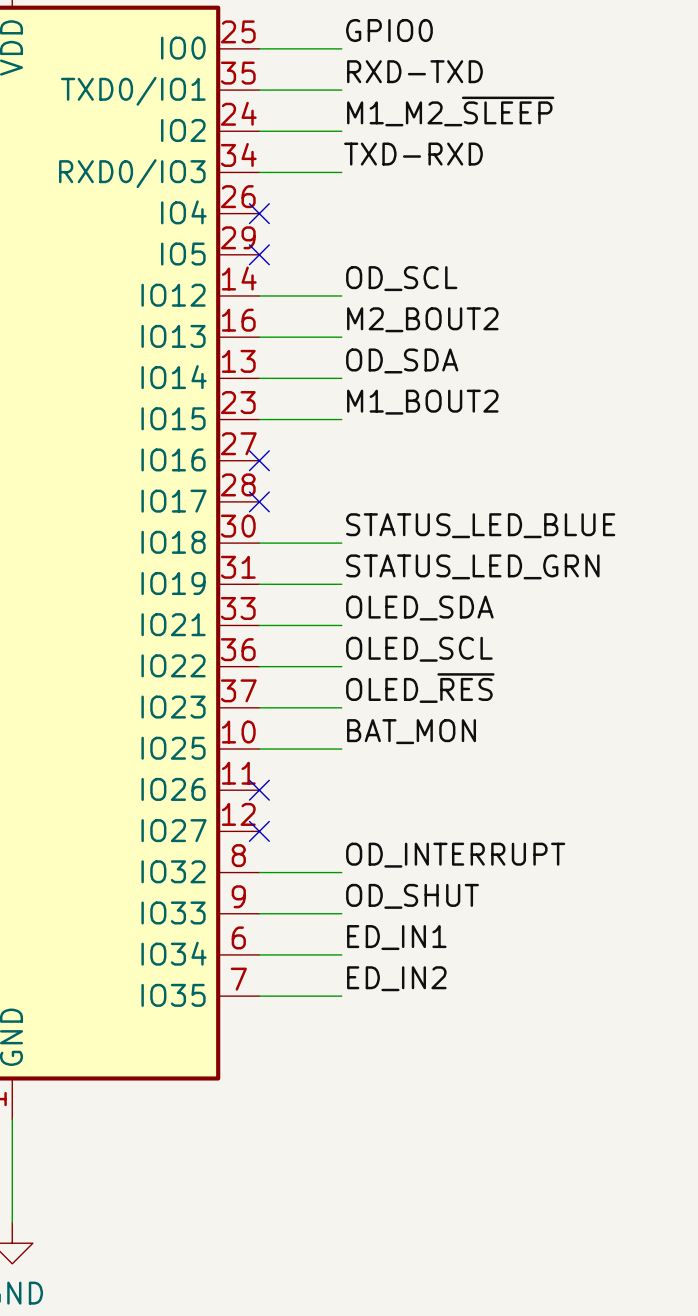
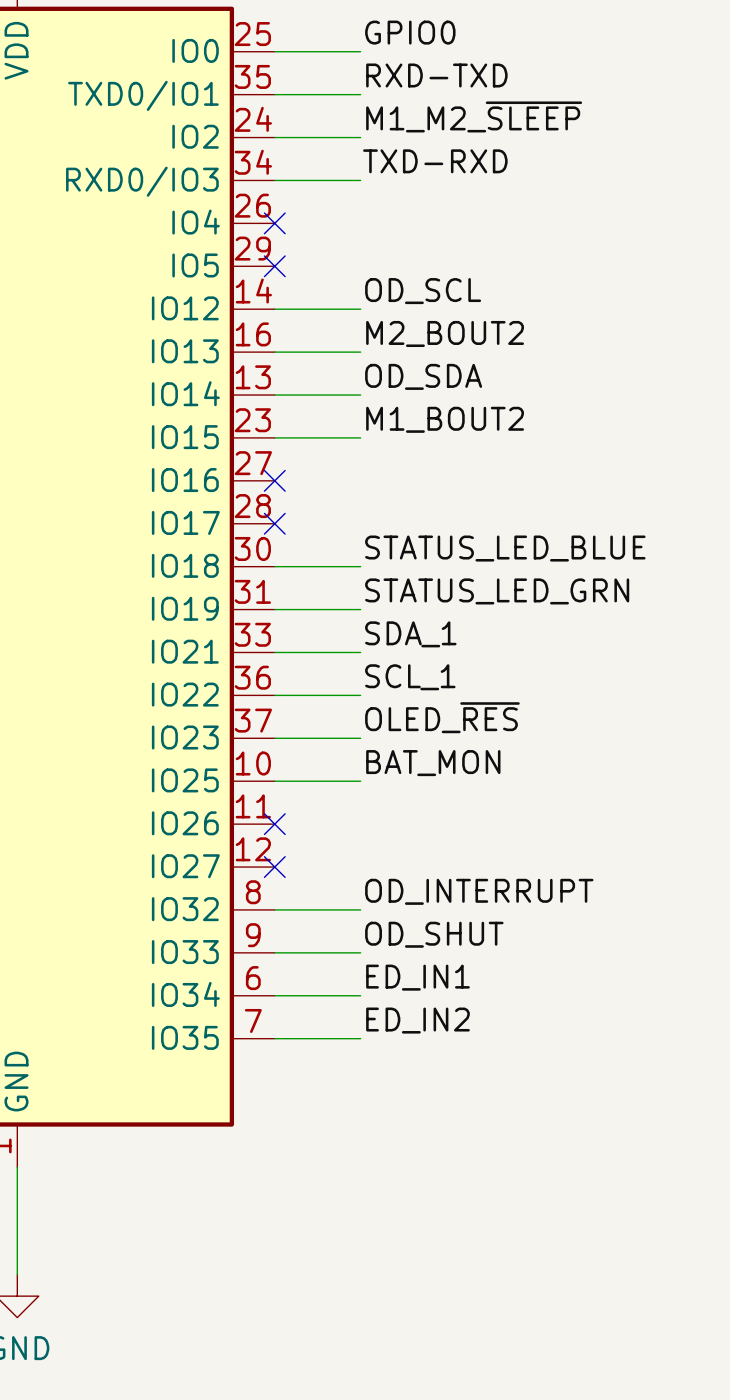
label: OLED_SDA (419, 608) -> SDA_1 (410, 634)
label: OLED_SCL (419, 649) -> SCL_1 (410, 677)

